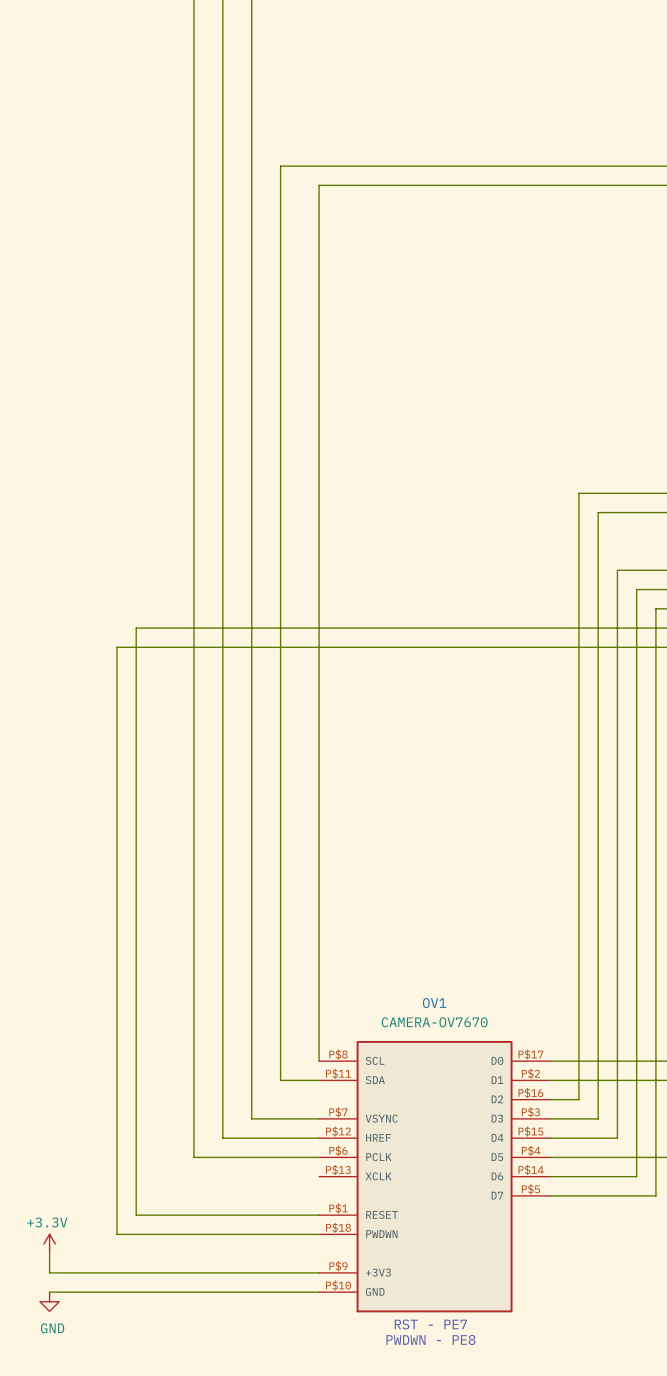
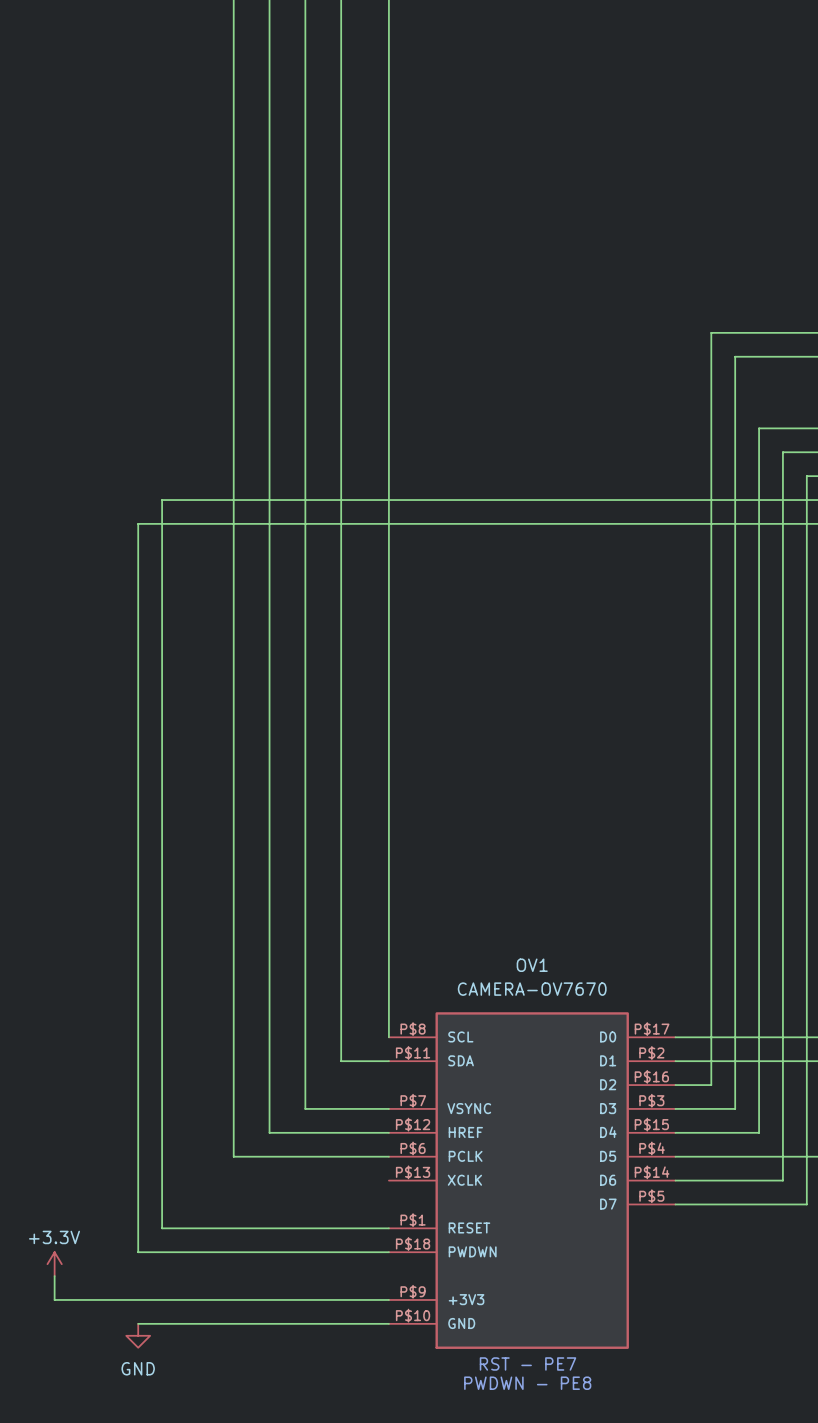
wire: (49, 1292) (116, 1292) -> none
power symbol position: GND (49, 1301) -> GND (138, 1335)

